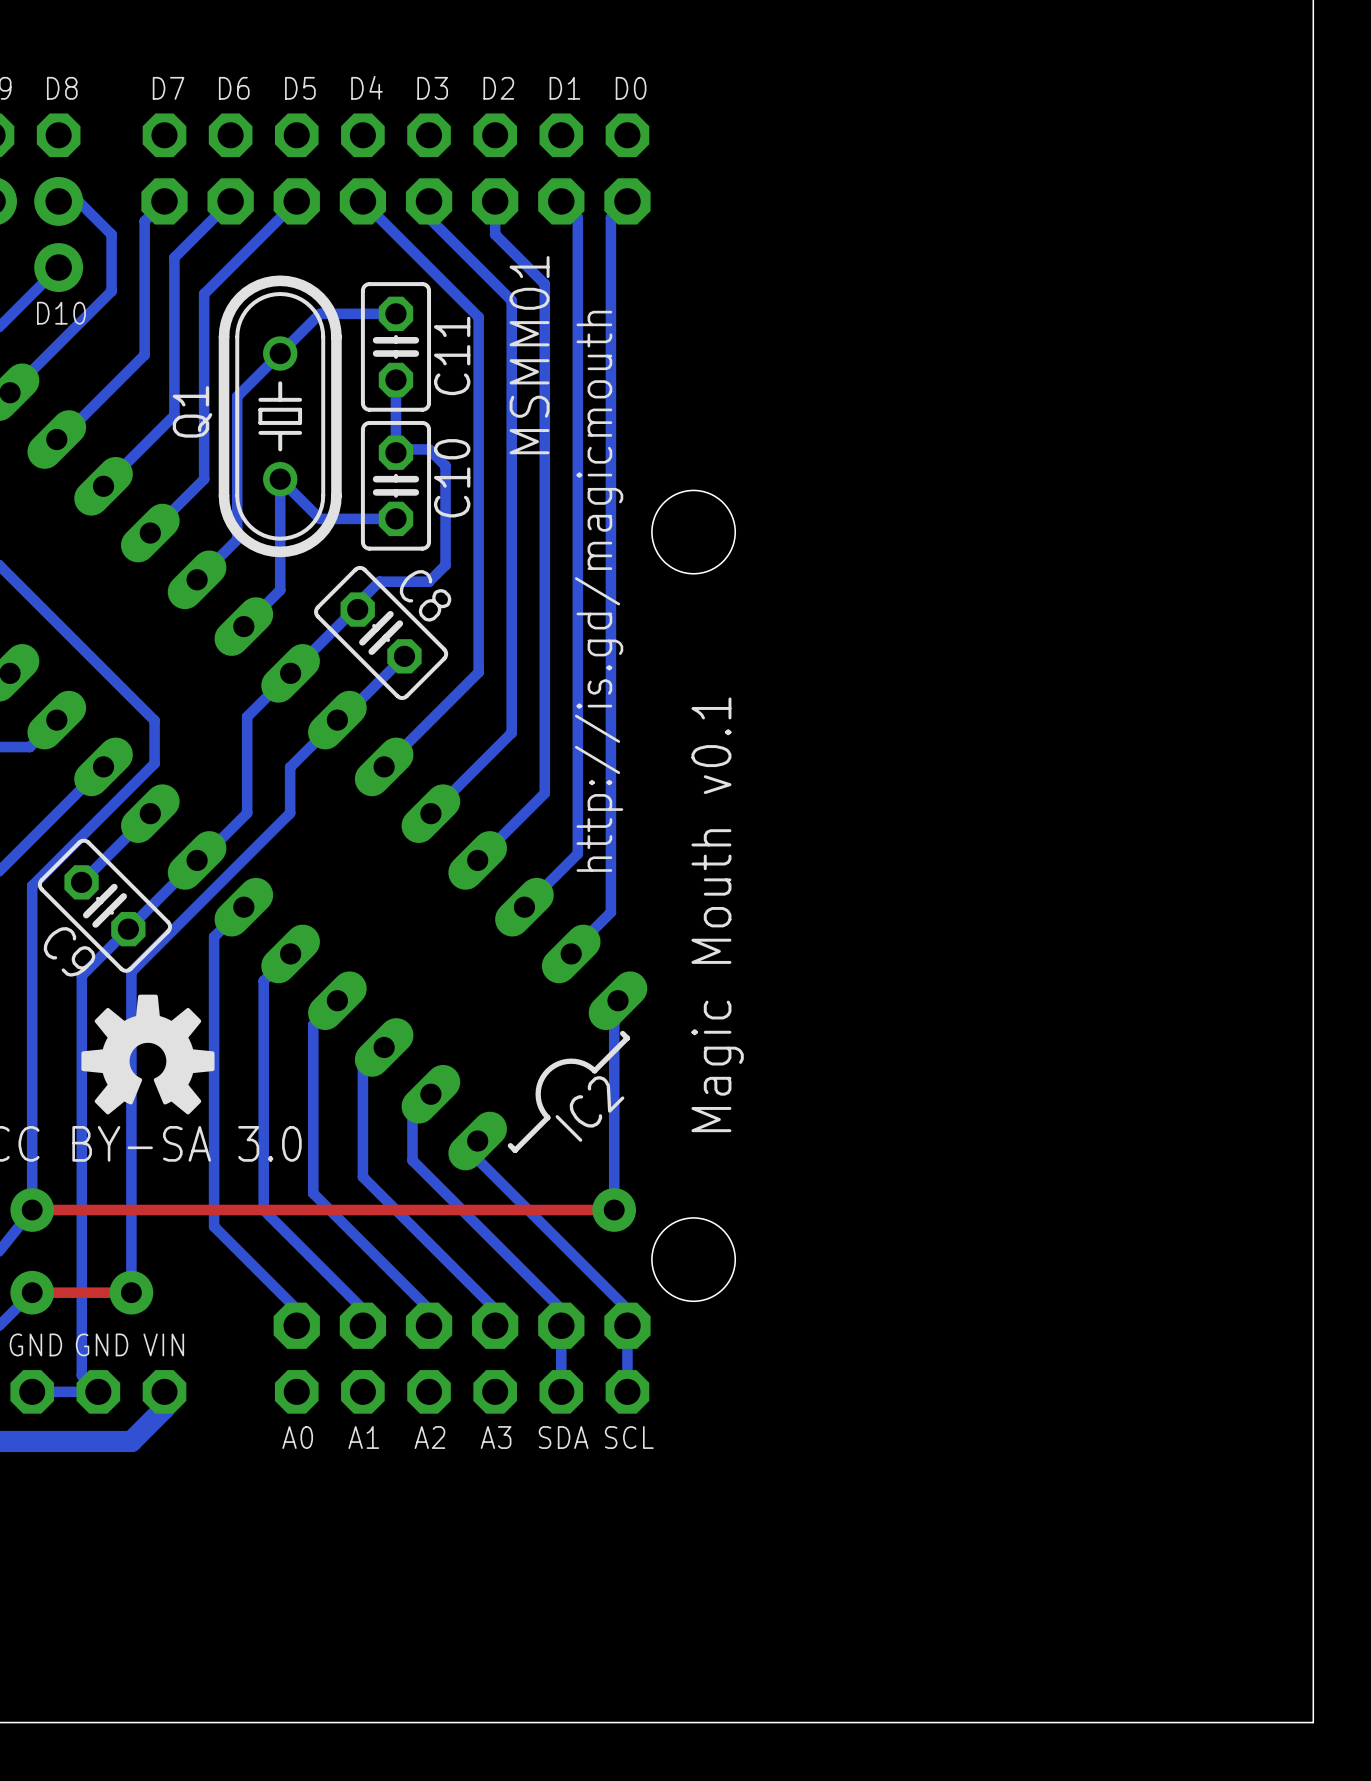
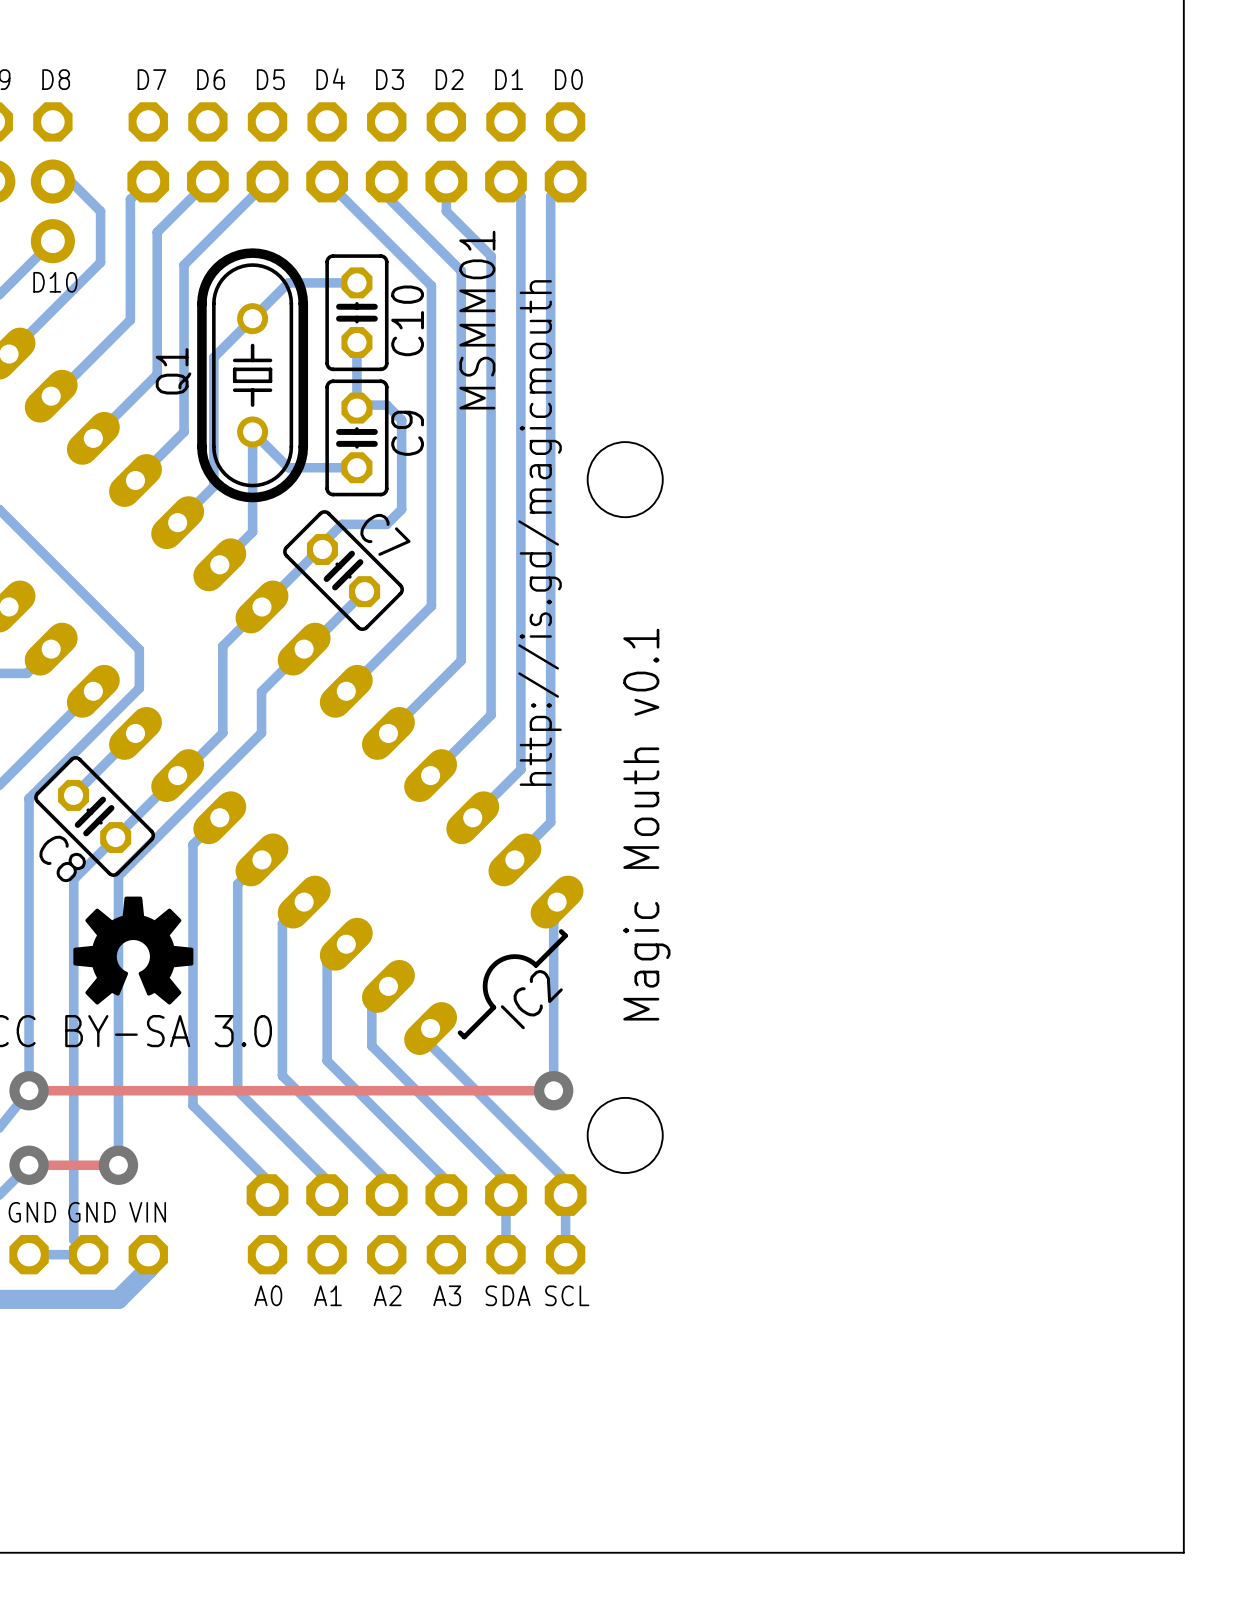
C11 name: C11 (452, 355) -> C10 (407, 320)
C10 name: C10 (452, 478) -> C9 (407, 433)
C8 name: C8 (425, 595) -> C7 (385, 534)
C9 name: C9 (69, 951) -> C8 (62, 858)

